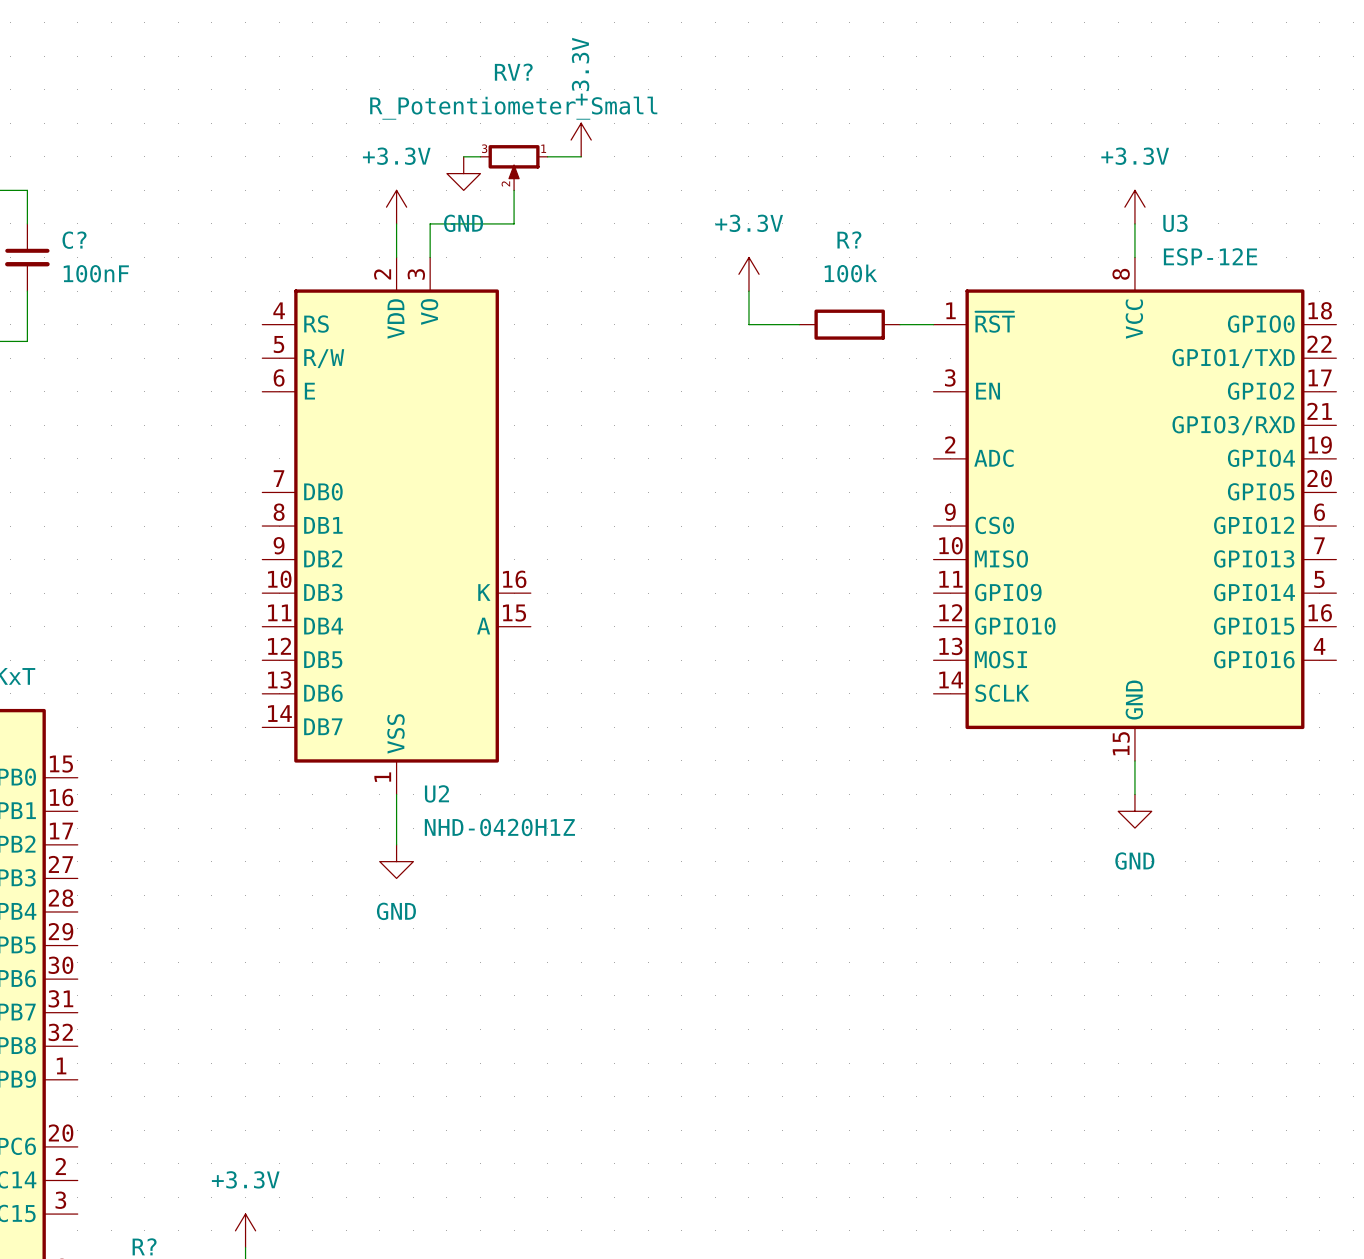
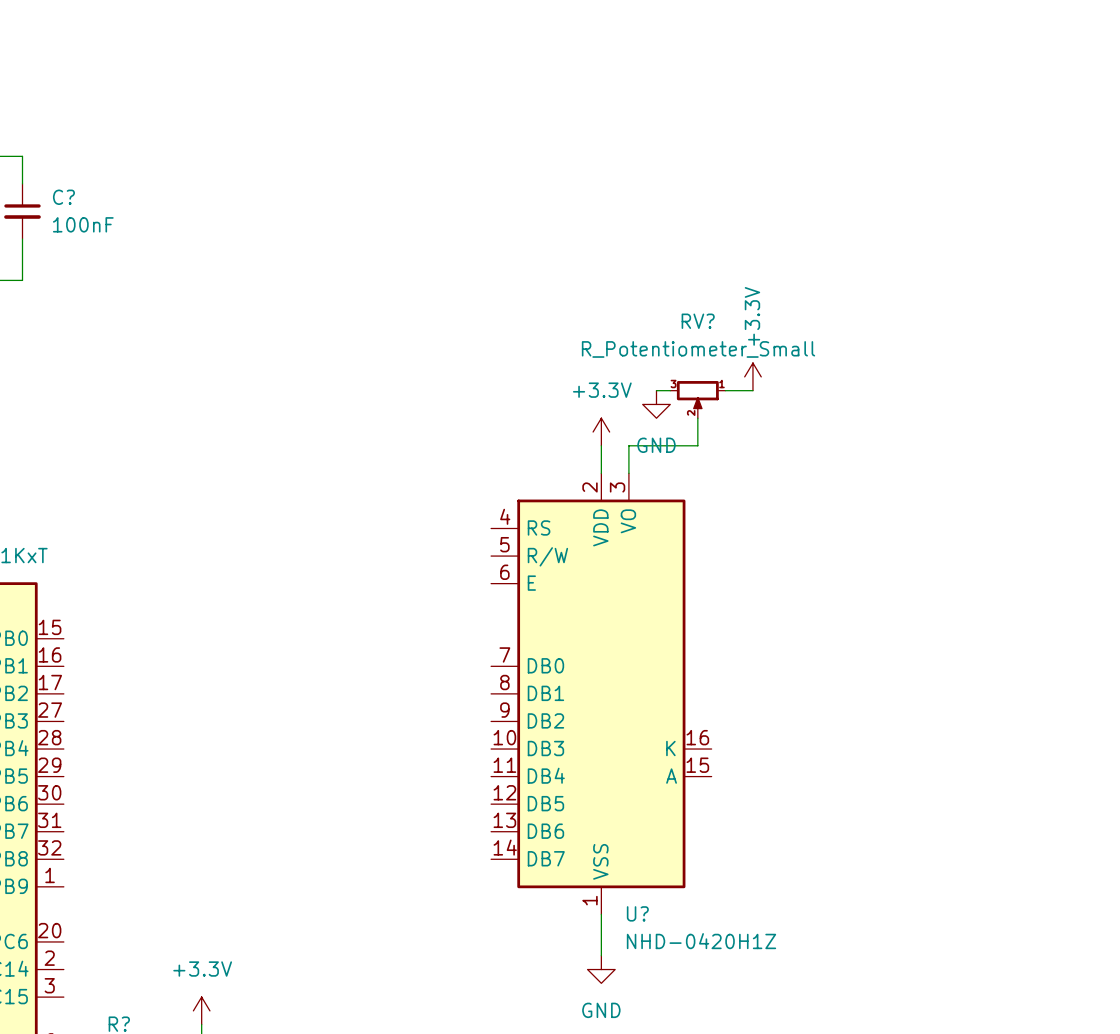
power symbol: +3.3V (581, 140) -> none
wire: (463, 156) (480, 156) -> none
wire: (547, 156) (581, 156) -> none
RV?: R_Potentiometer_Small (514, 167) -> none
power symbol: GND (463, 173) -> none
wire: (514, 190) (514, 223) (430, 223) (430, 257) -> none
power symbol: +3.3V (396, 207) -> none
power symbol: +3.3V (1134, 207) -> none
wire: (396, 223) (396, 257) -> none
wire: (1134, 223) (1134, 257) -> none
power symbol: +3.3V (748, 274) -> none
wire: (748, 291) (748, 324) (799, 324) -> none
R?: 100k (849, 324) -> none
wire: (900, 324) (933, 324) -> (725, 390) (752, 390)
power symbol: none -> +3.3V (752, 376)
wire: none -> (656, 390) (670, 390)
RV?: none -> R_Potentiometer_Small (697, 399)
power symbol: none -> GND (656, 404)
wire: none -> (697, 418) (697, 445) (628, 445) (628, 473)
U3: ESP-12E (1134, 509) -> none
U2: NHD-0420H1Z (396, 526) -> none
power symbol: none -> +3.3V (601, 432)
wire: none -> (601, 445) (601, 473)
wire: (1134, 760) (1134, 794) -> none
wire: (396, 794) (396, 844) -> none
power symbol: GND (1134, 811) -> none
U?: none -> NHD-0420H1Z (601, 693)
power symbol: GND (396, 861) -> none
wire: none -> (601, 914) (601, 955)
power symbol: none -> GND (601, 969)

